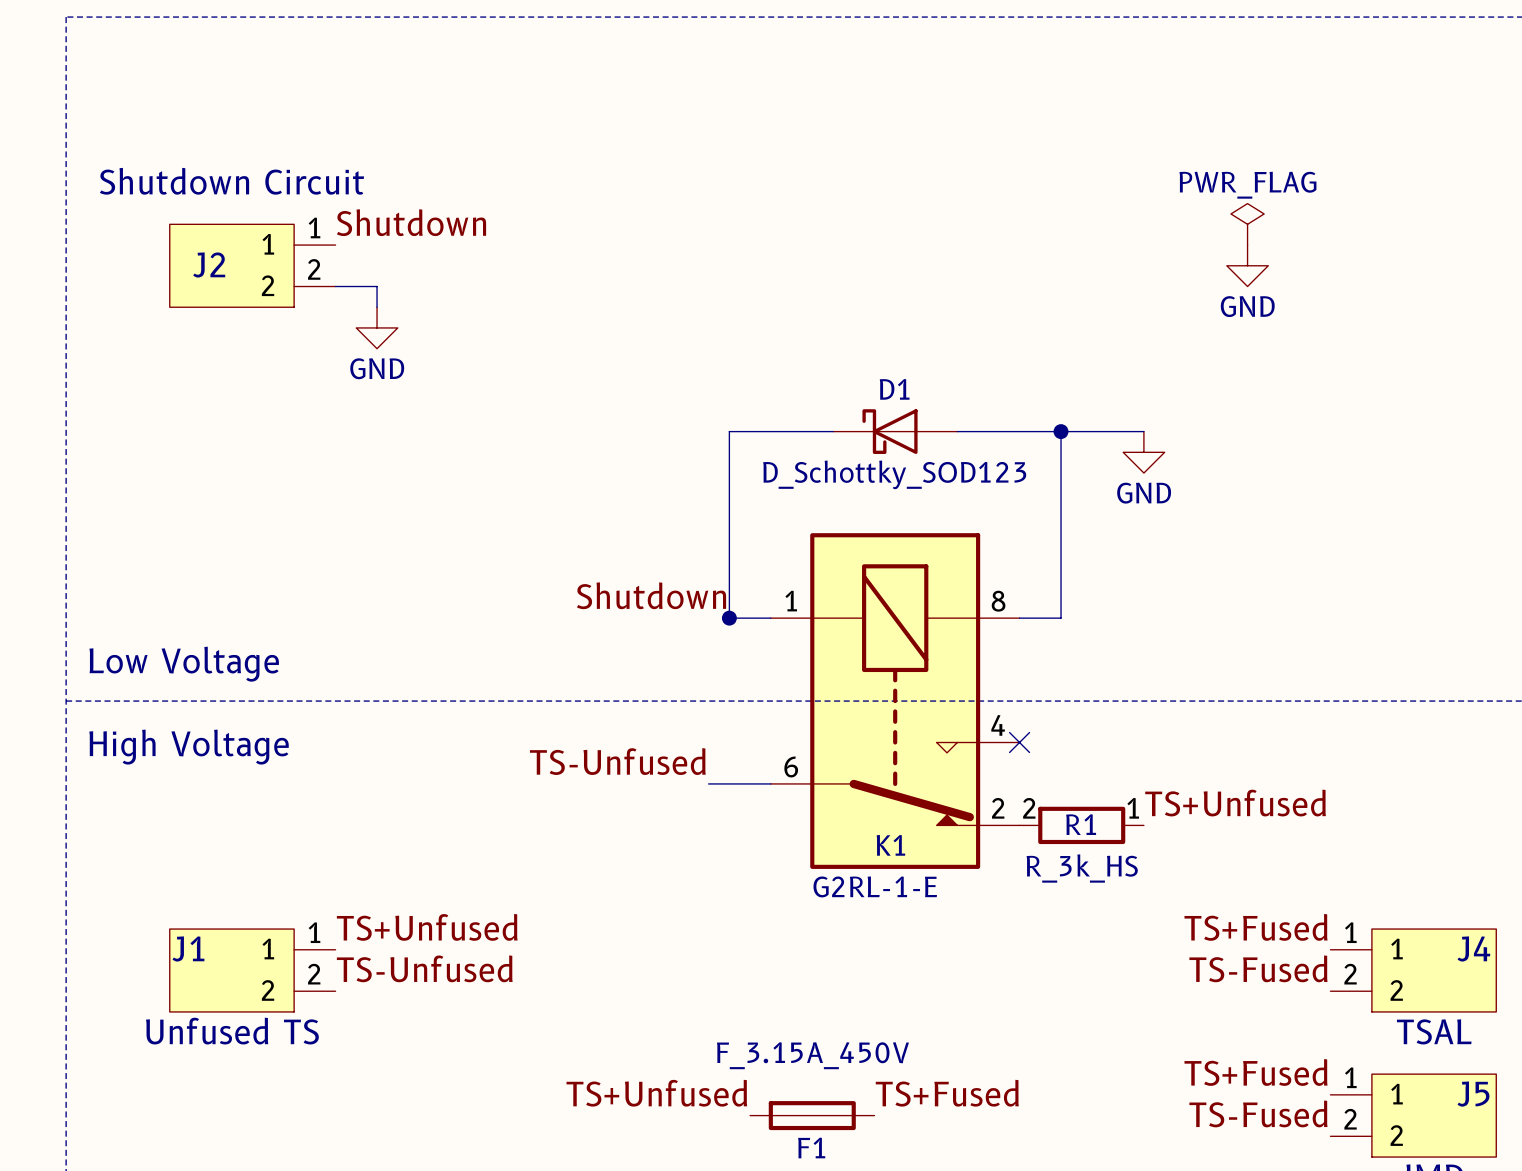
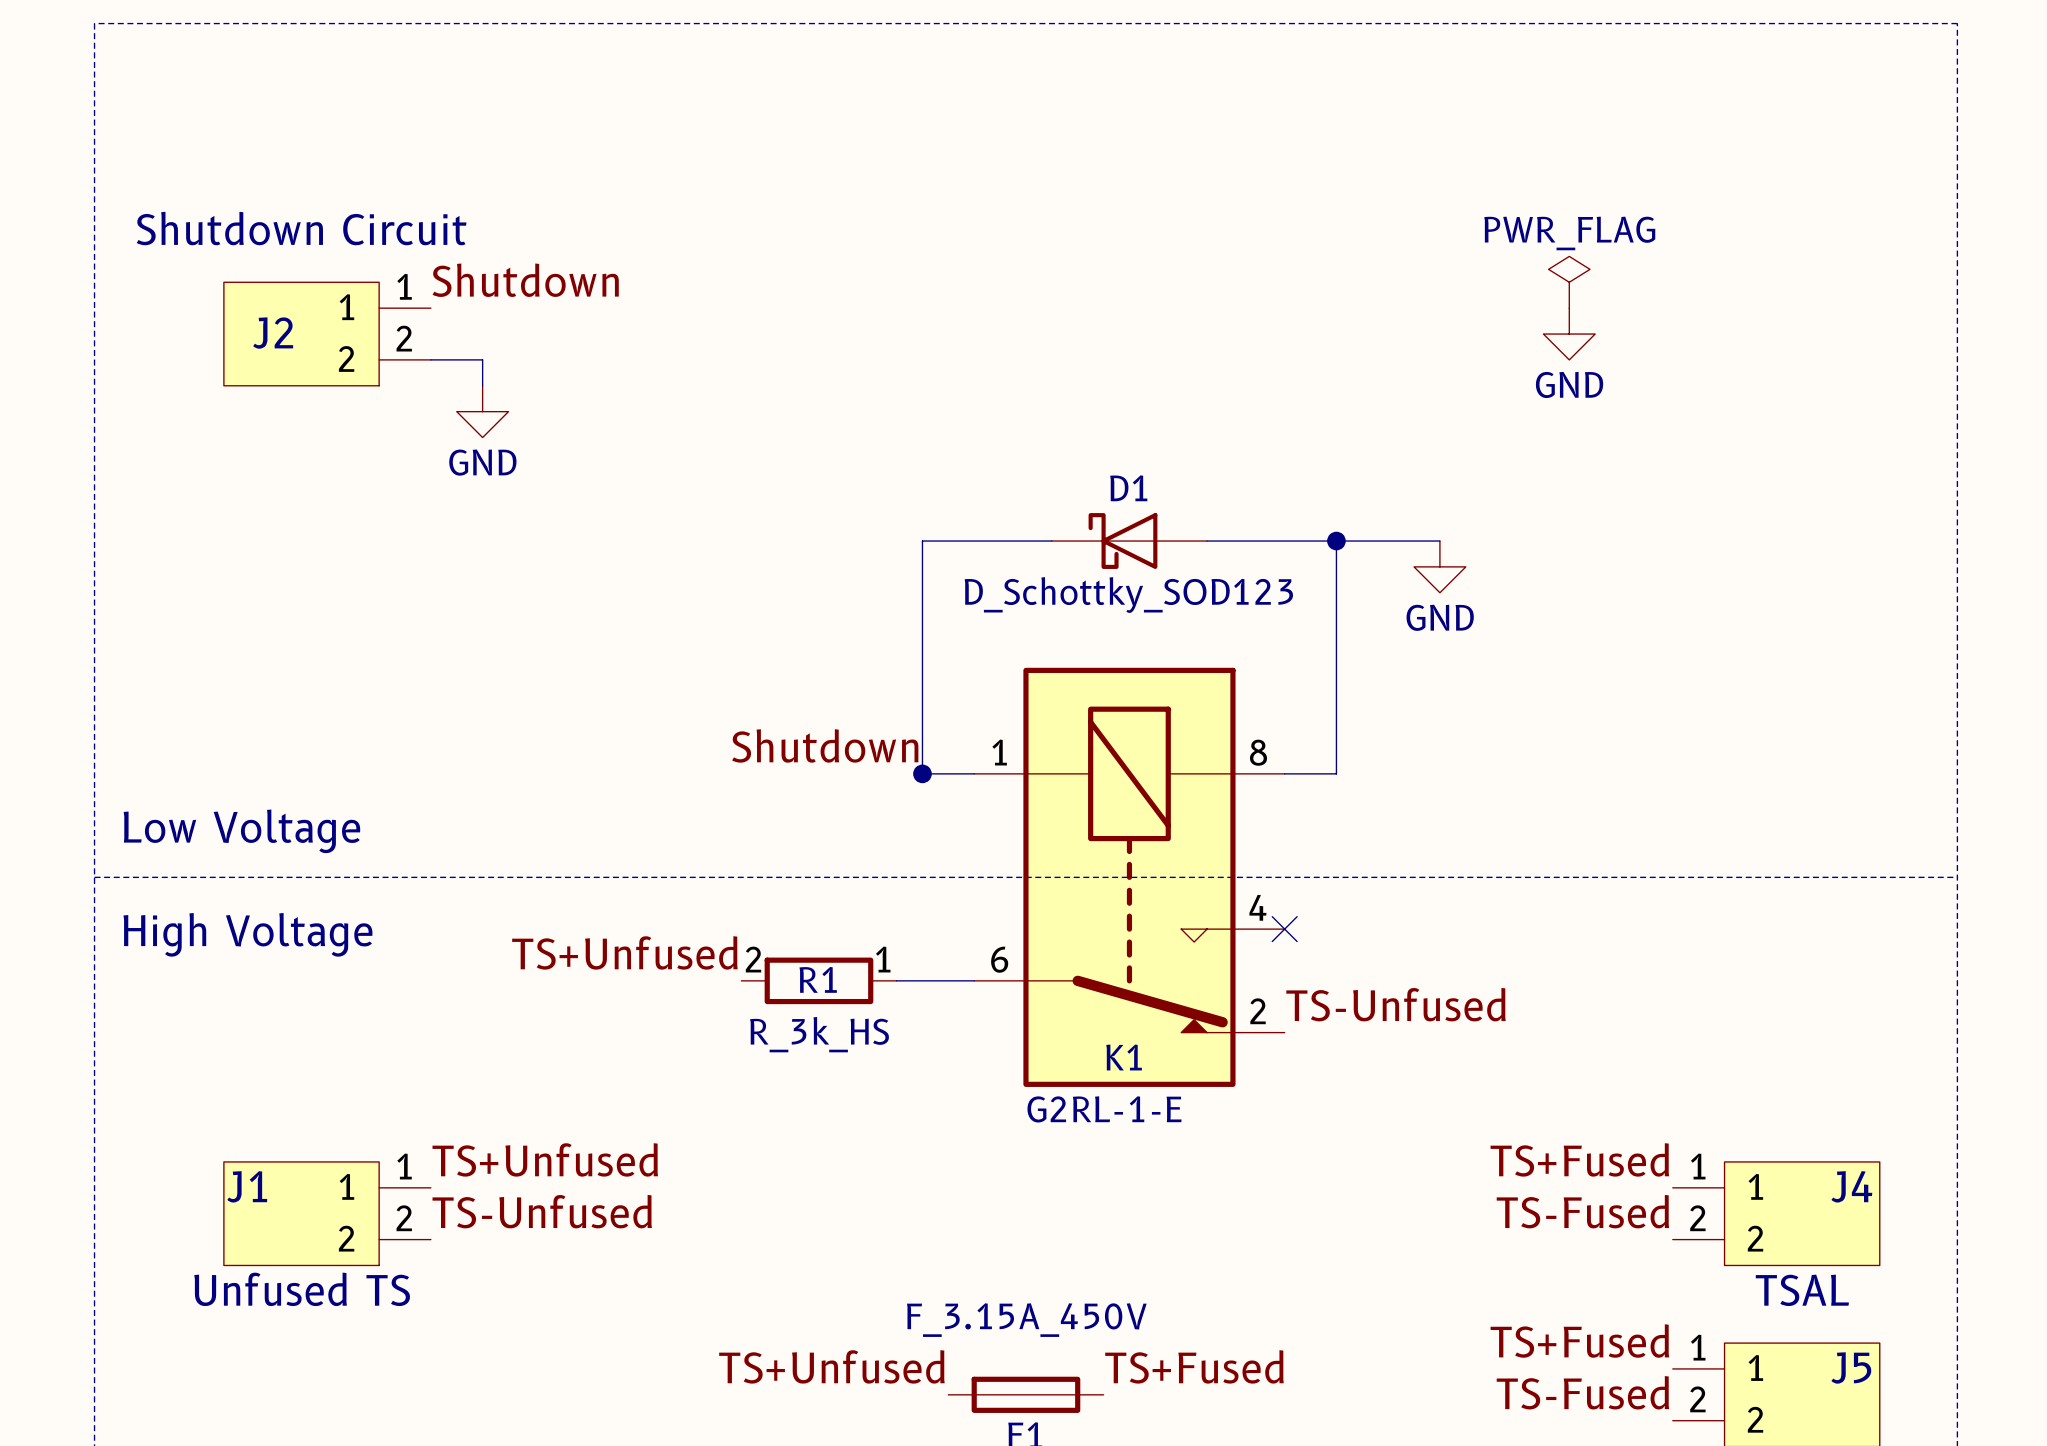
label: none -> TS+Unfused (624, 952)
label position: TS-Unfused (617, 761) -> TS-Unfused (1396, 1004)
label: TS+Unfused (1235, 803) -> none
R1 position: (1081, 825) -> (818, 980)

